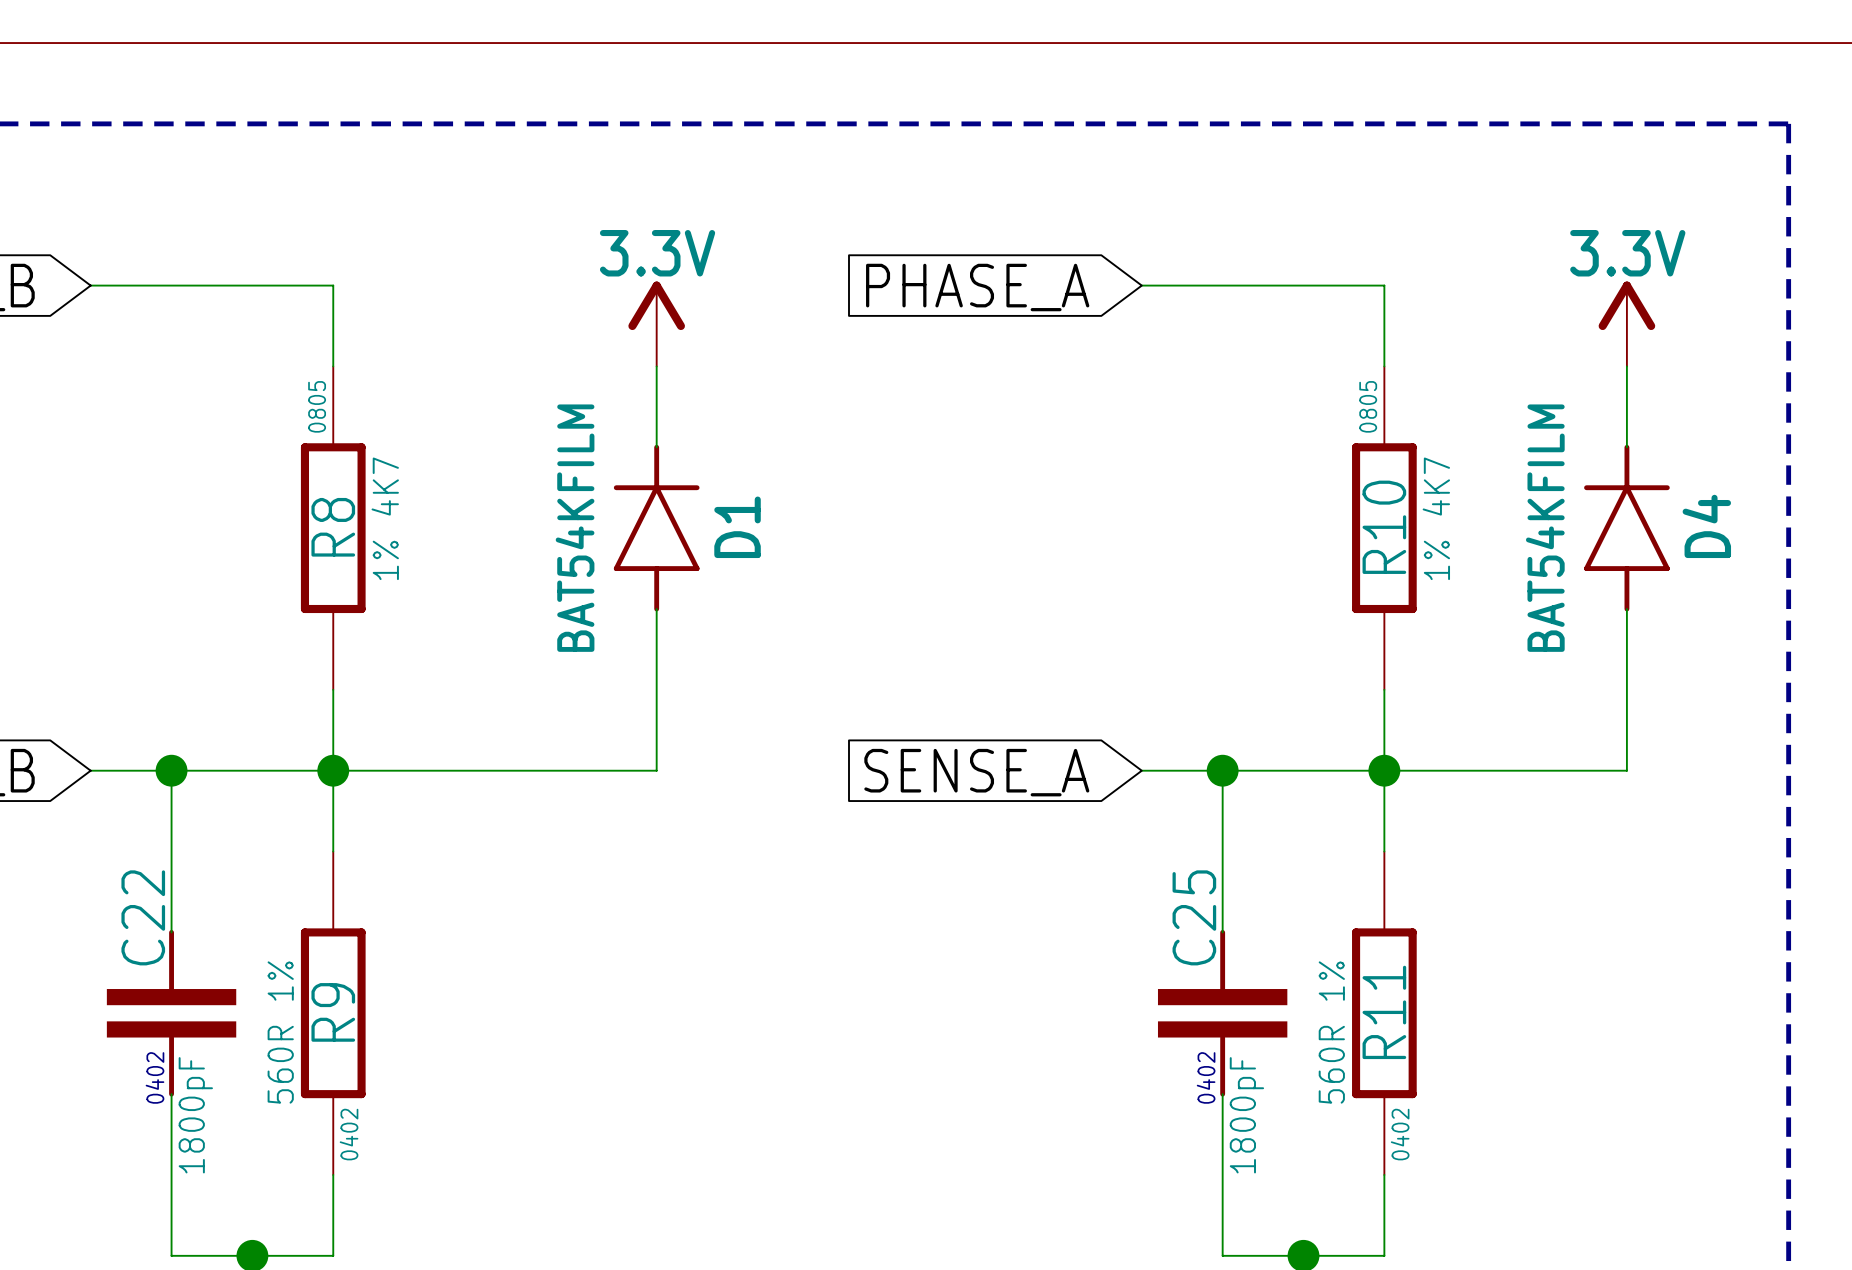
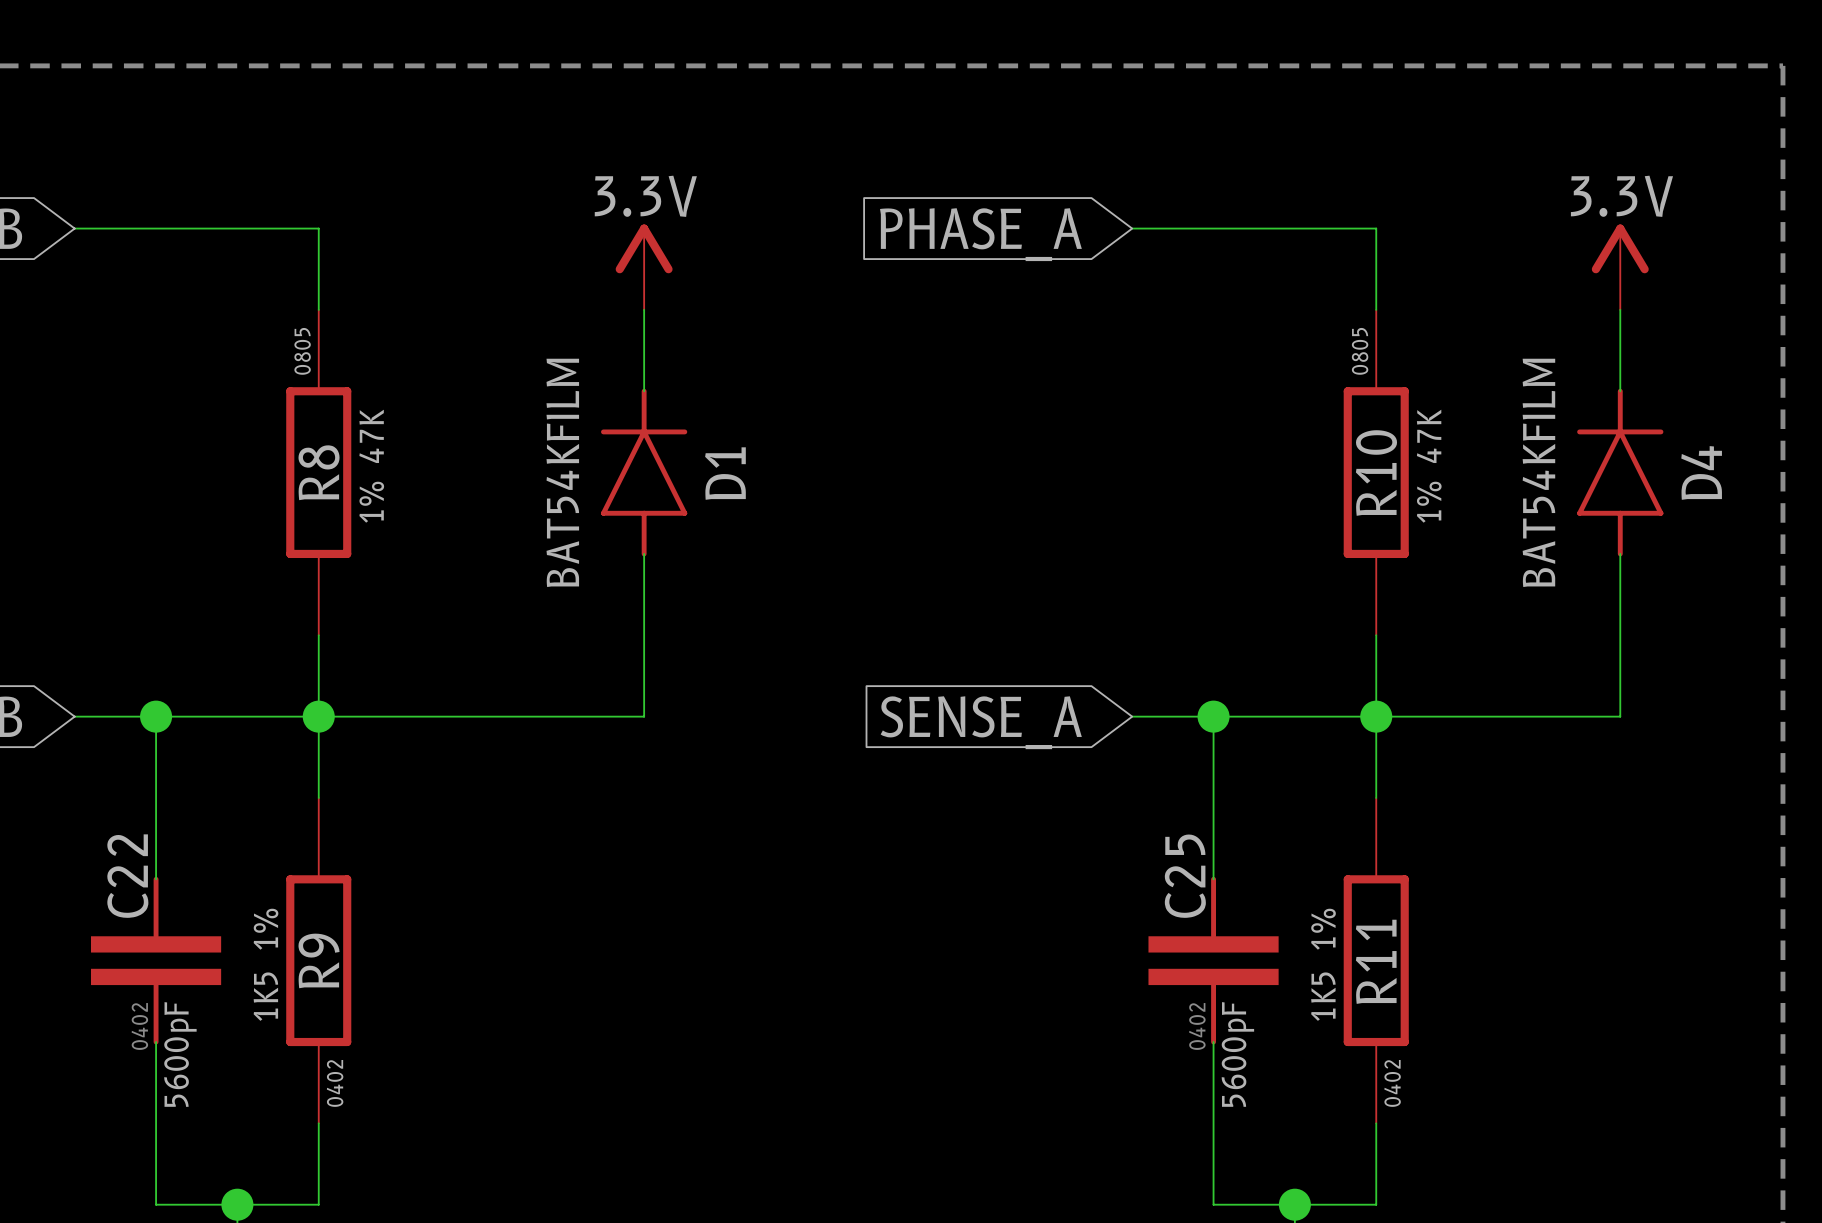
R8 value: 4K7 (385, 486) -> 47K (371, 436)
R10 value: 4K7 (1436, 486) -> 47K (1429, 436)
R9 value: 560R (280, 1064) -> 1K5 (265, 996)
R11 value: 560R (1331, 1064) -> 1K5 (1323, 996)
C22 value: 1800pF (195, 1115) -> 5600pF (180, 1054)
C25 value: 1800pF (1246, 1115) -> 5600pF (1237, 1054)

